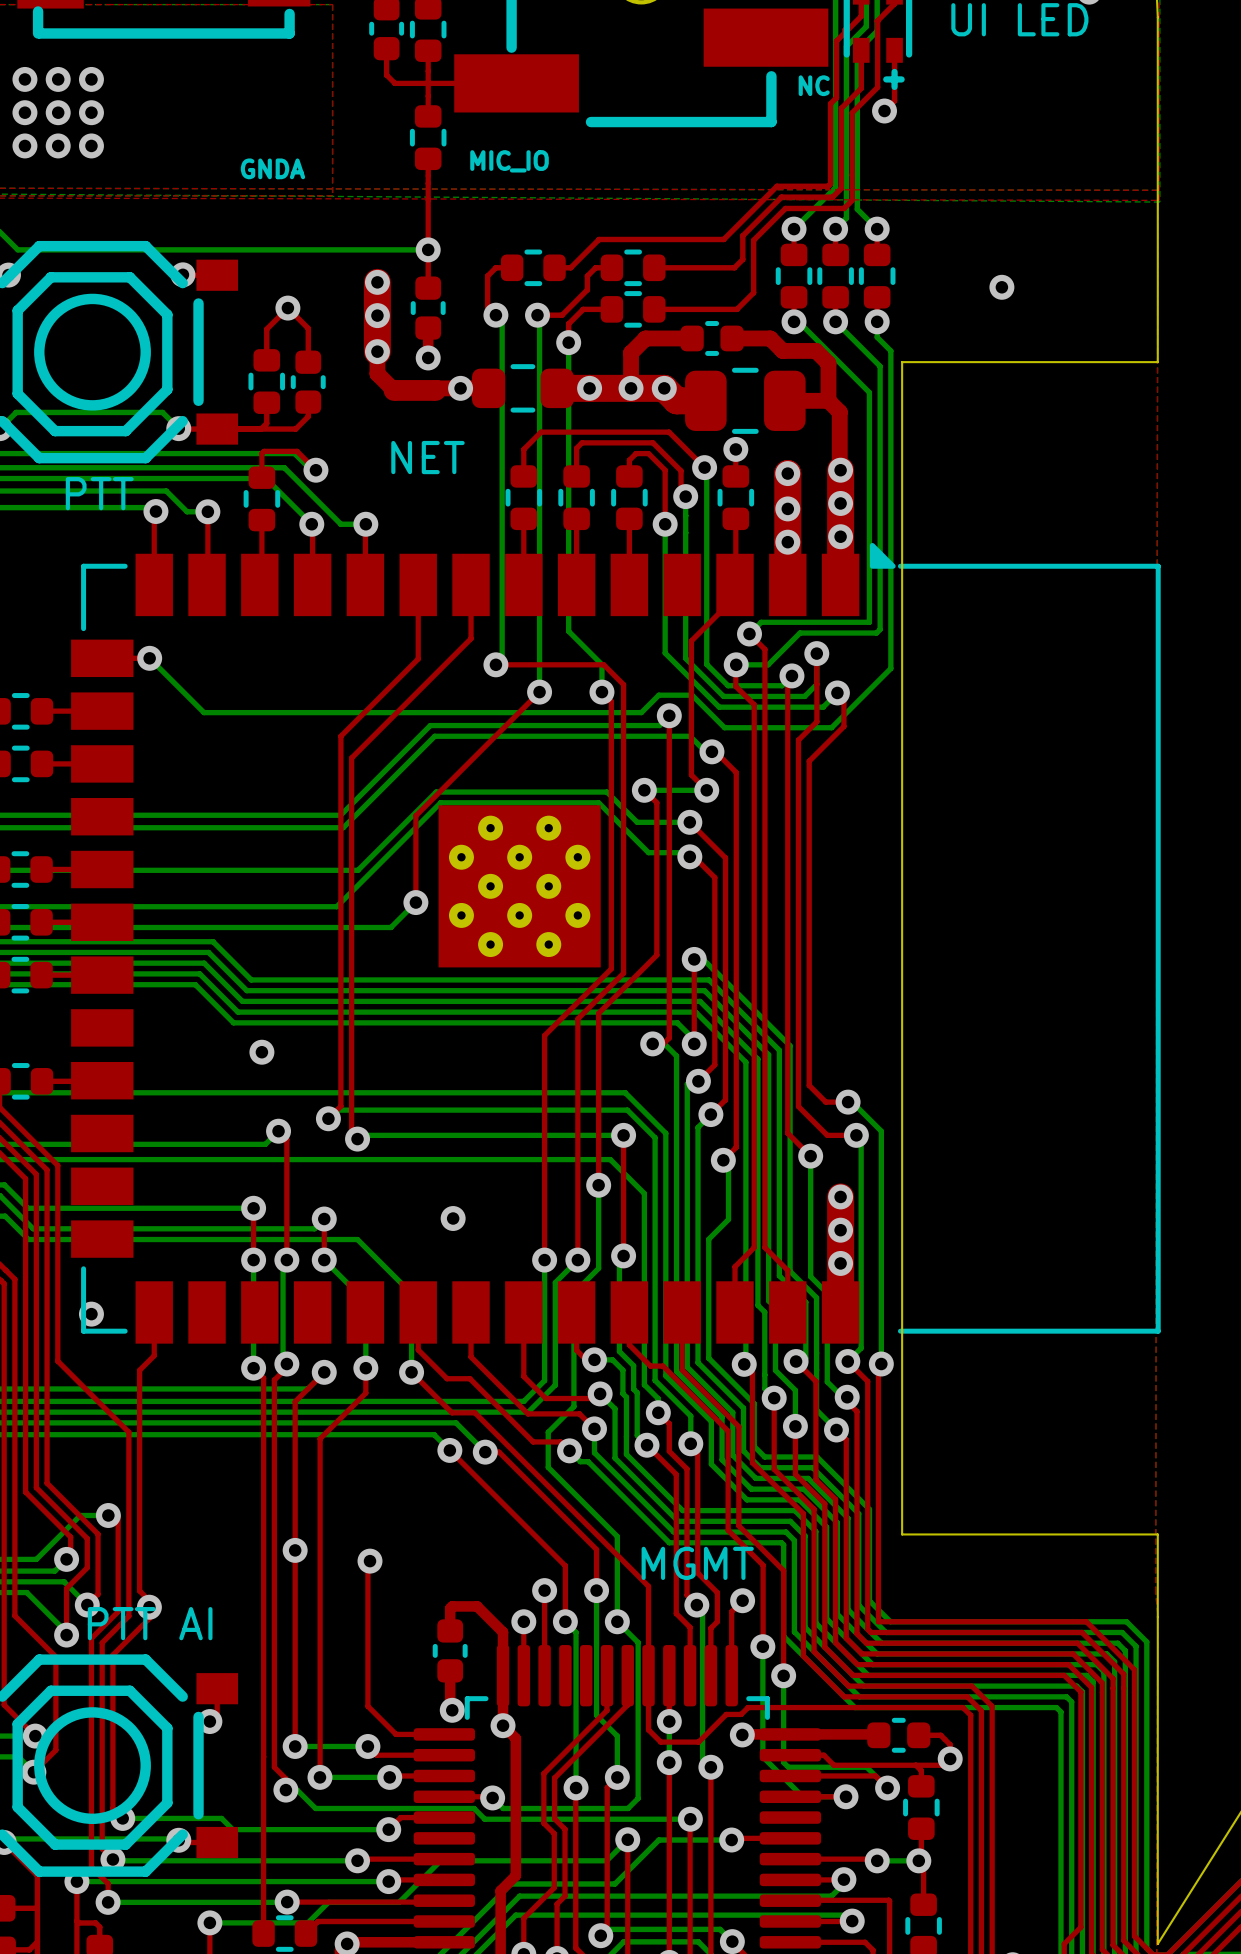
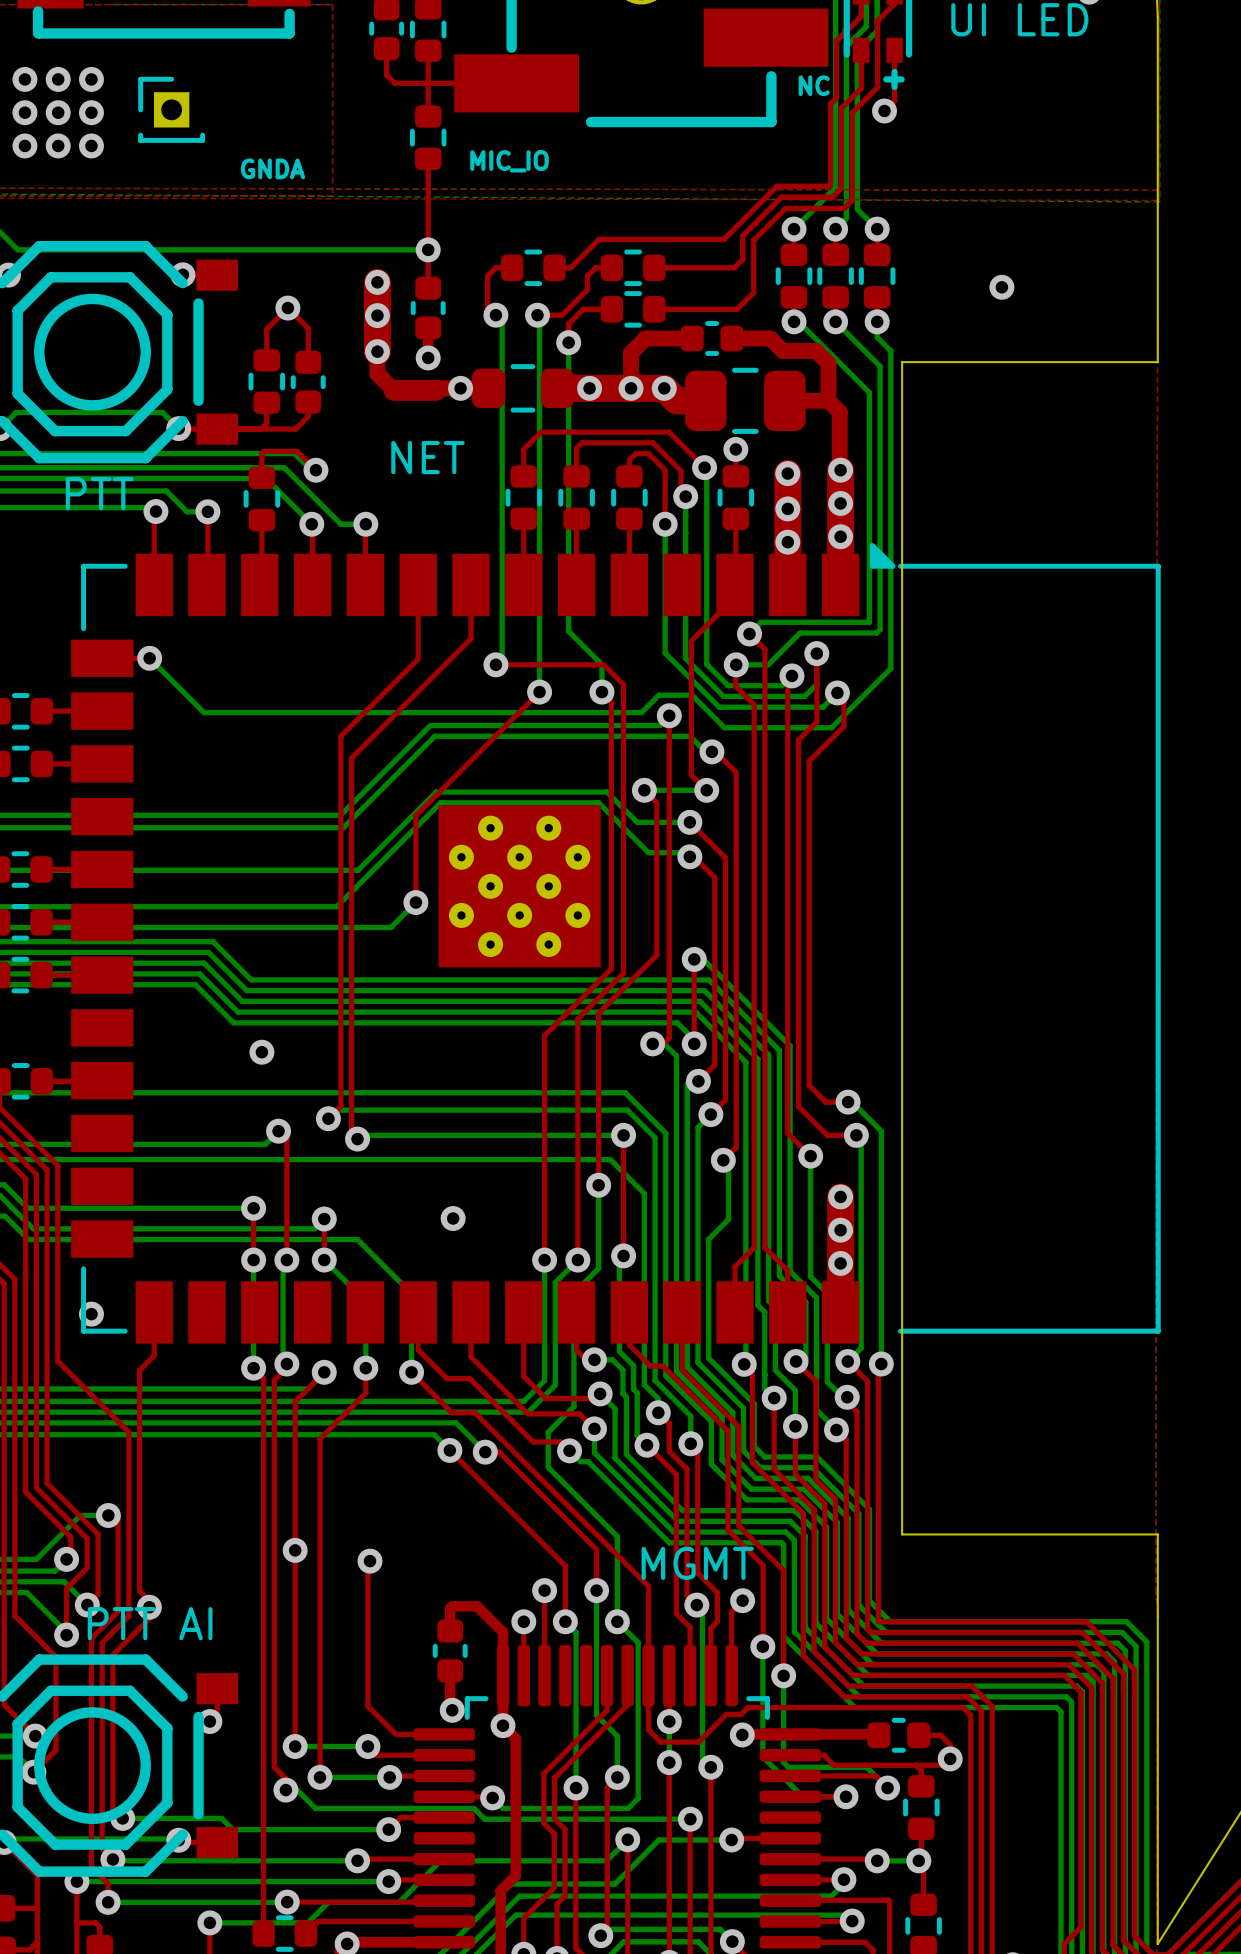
part: none -> (171, 109)

